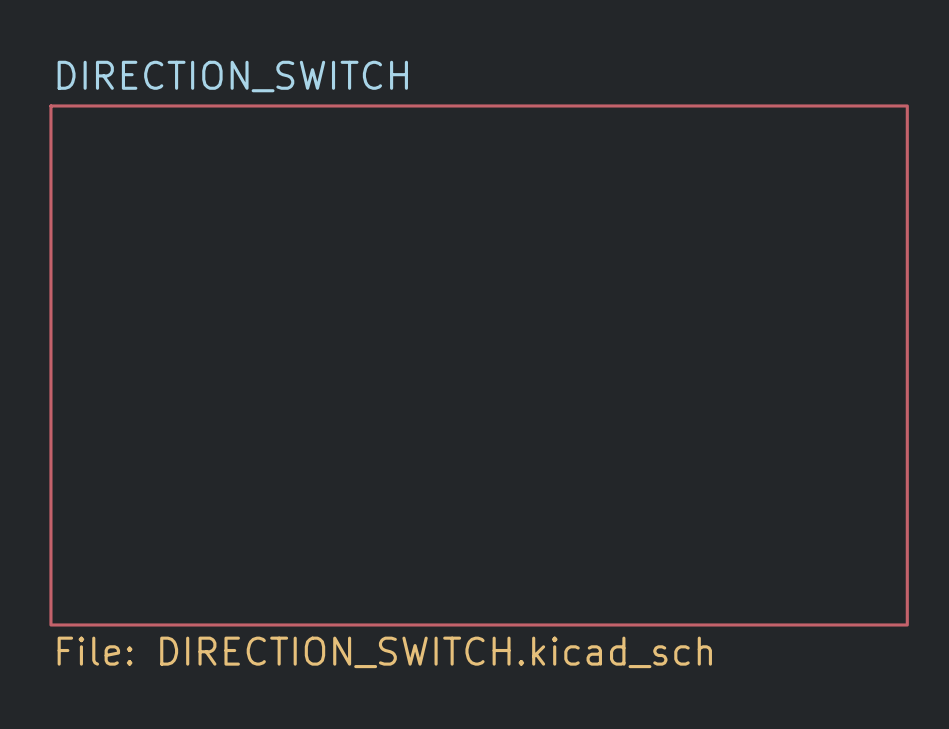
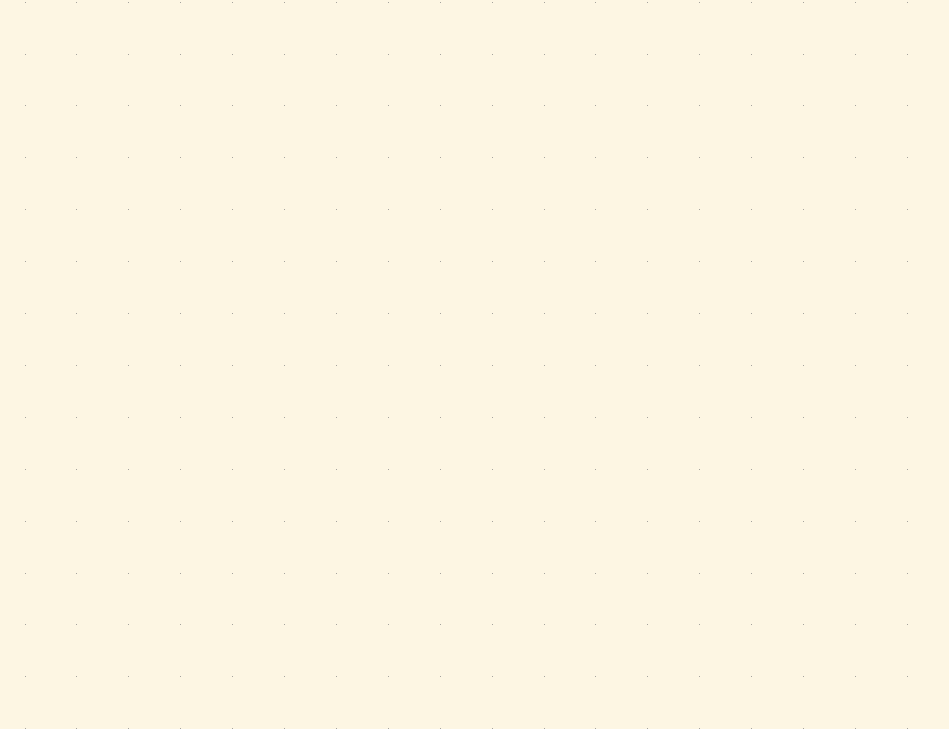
sheet DIRECTION_SWITCH: File: DIRECTION_SWITCH.kicad_sch (479, 365) -> none

